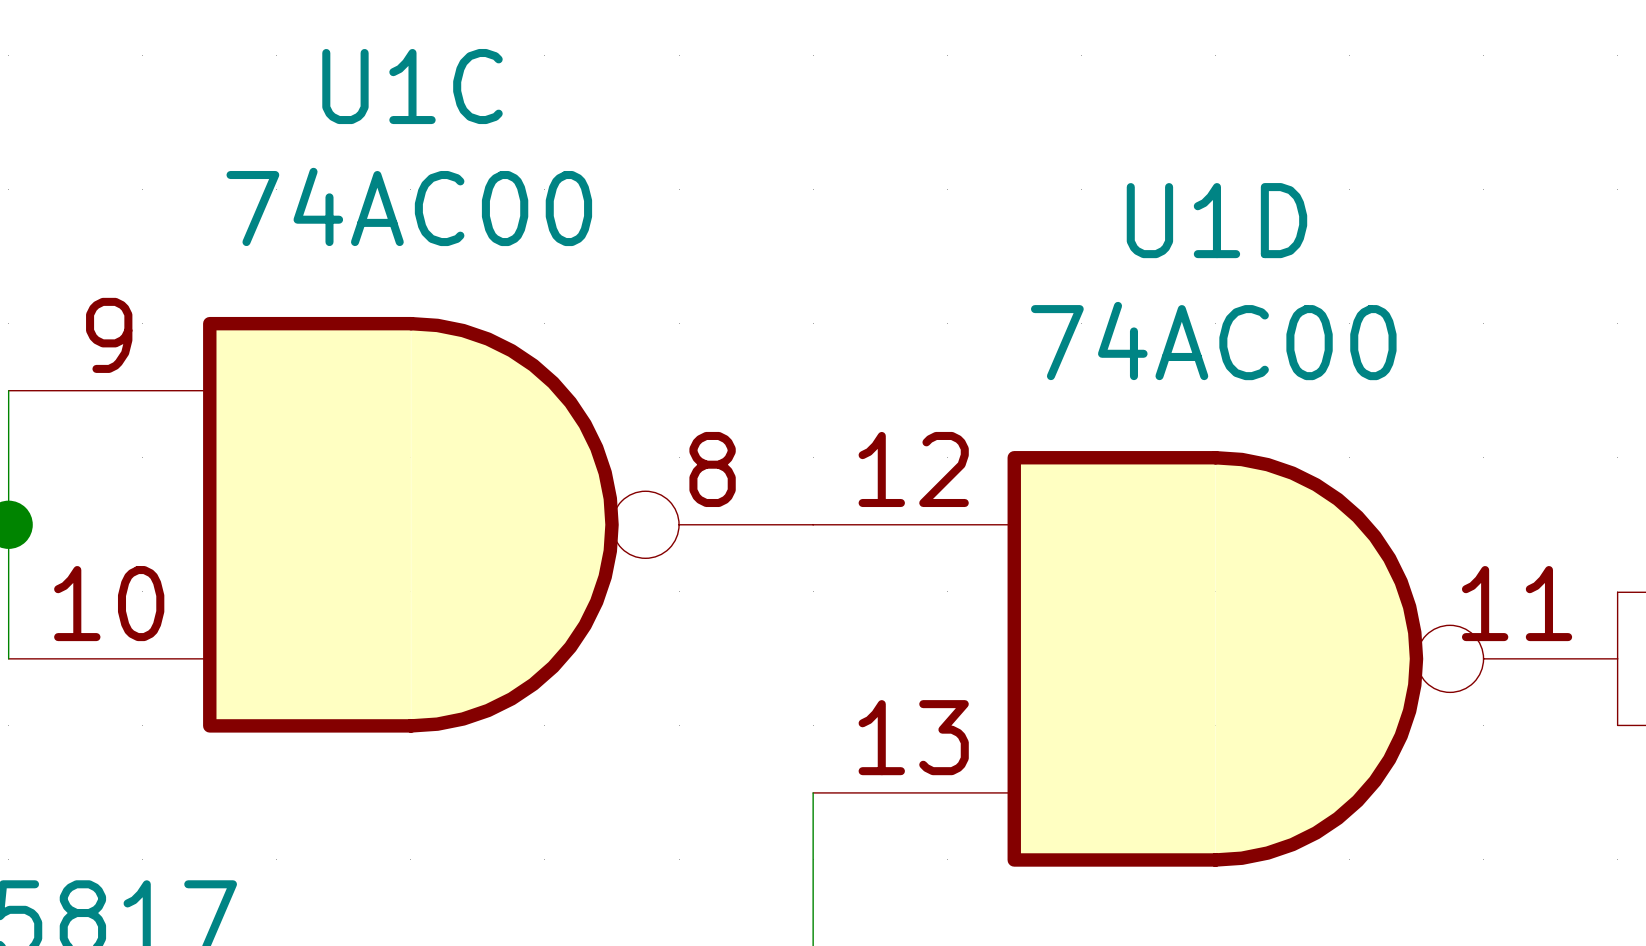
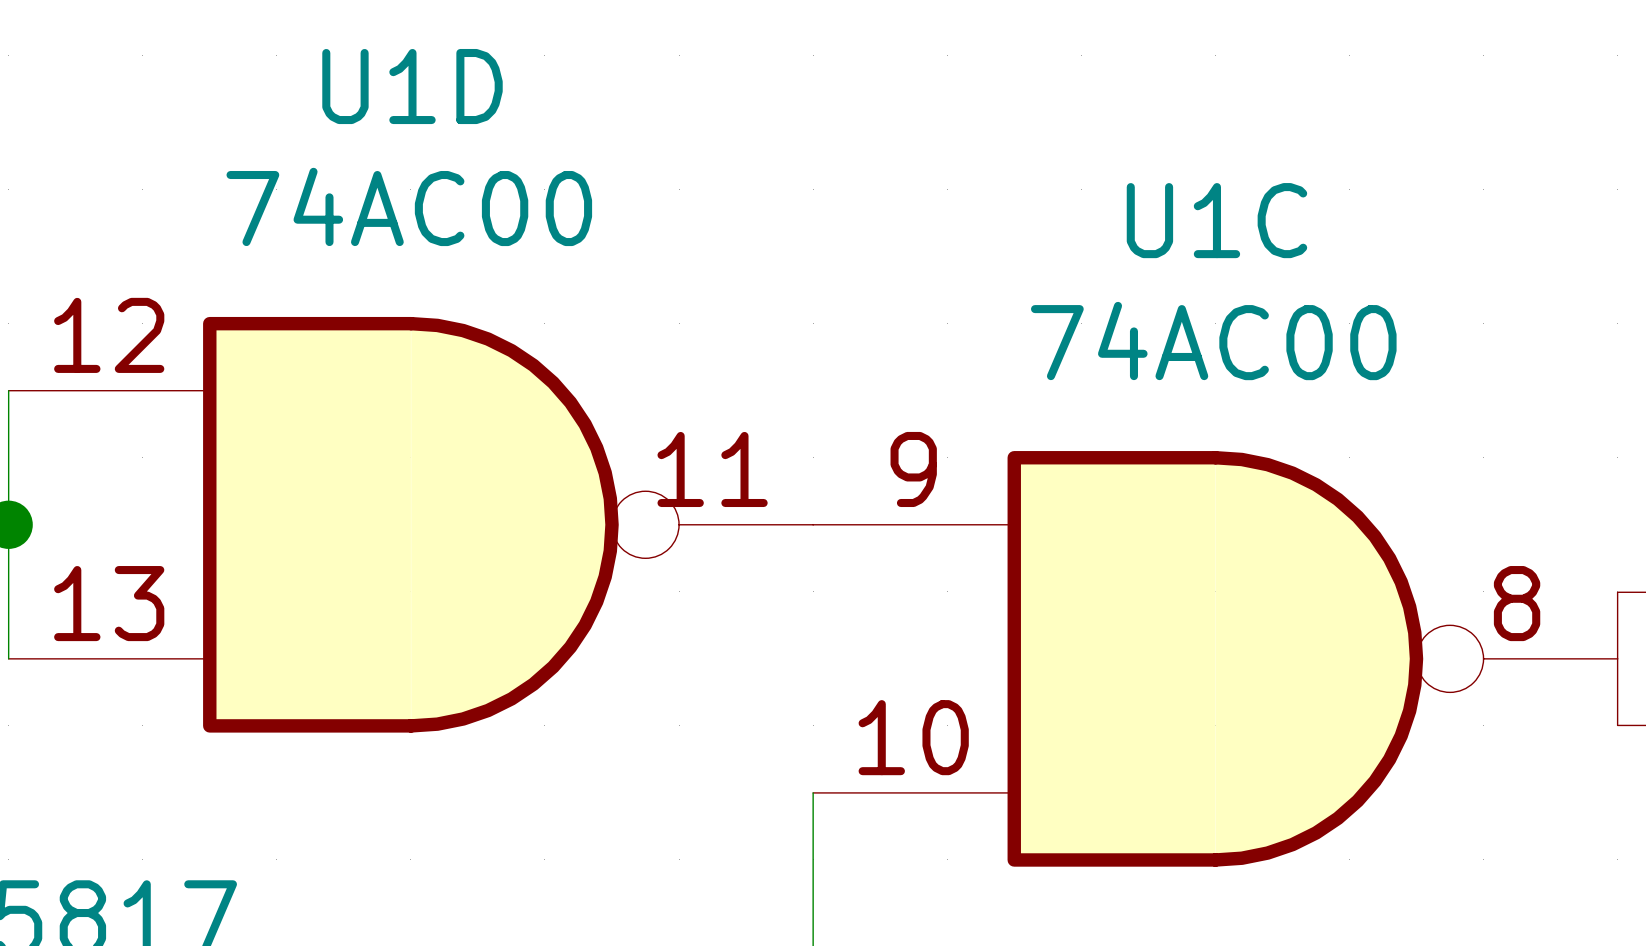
U1C position: (410, 524) -> (1215, 658)
U1D position: (1215, 658) -> (410, 524)

